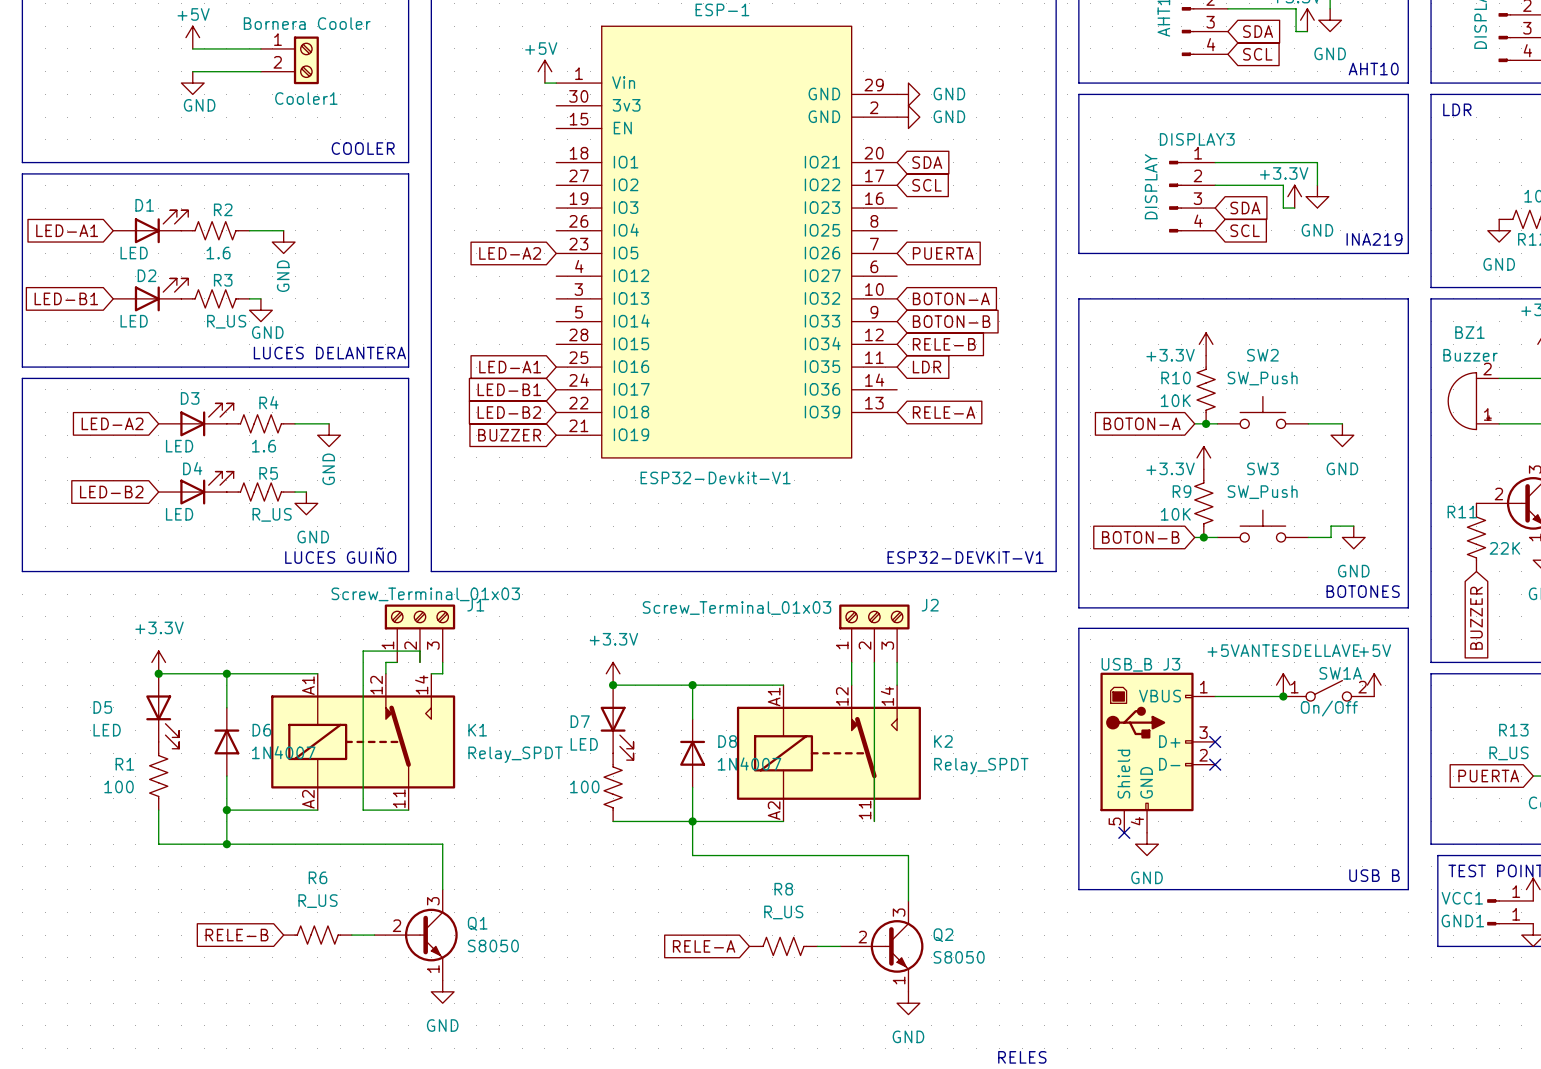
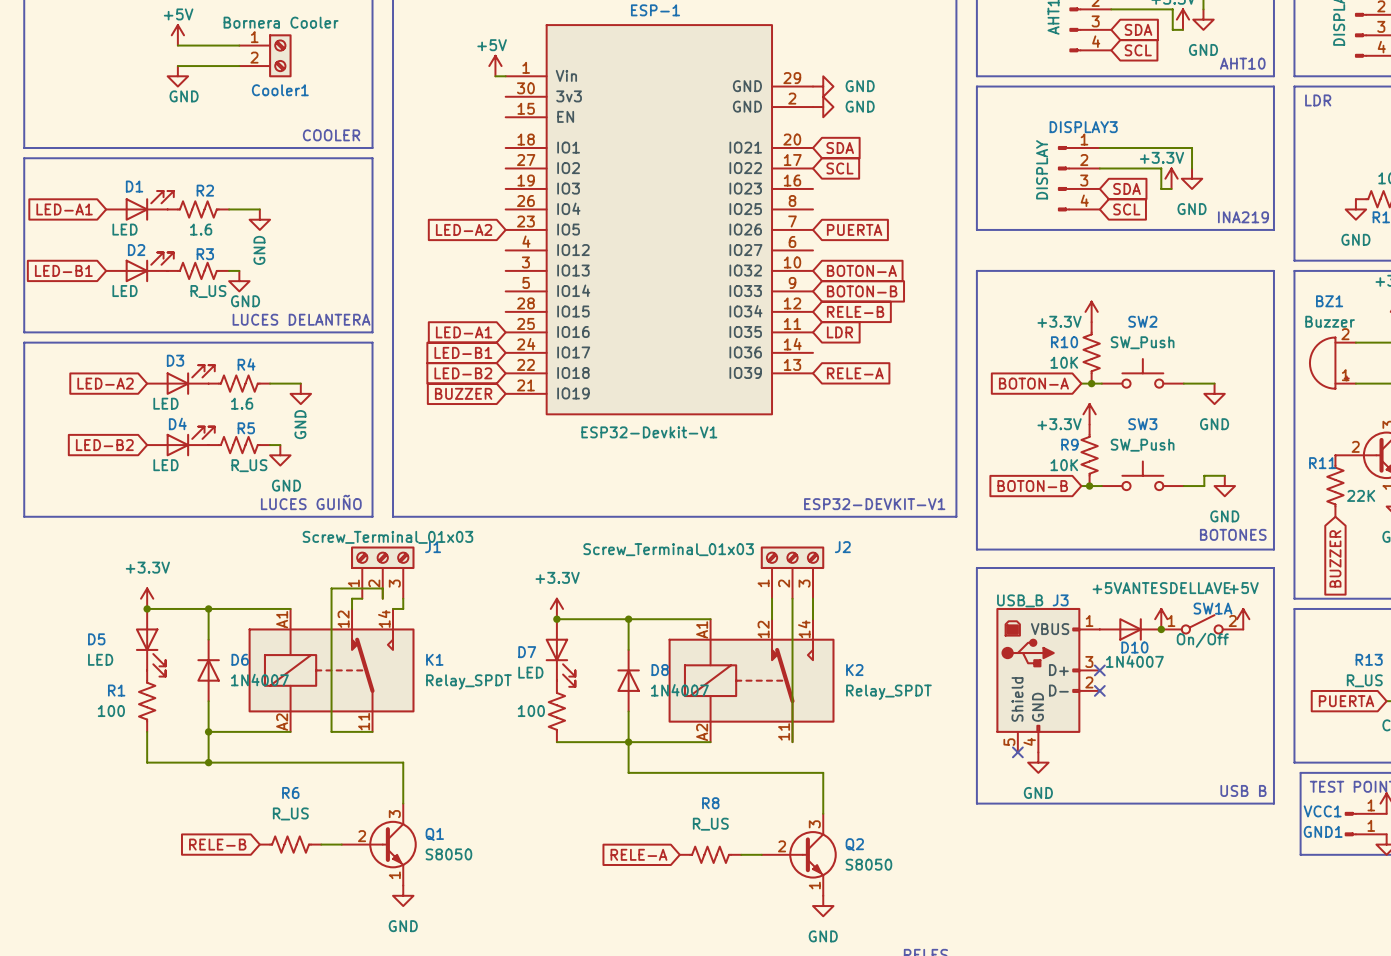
D10: none -> 1N4007 (1130, 629)

